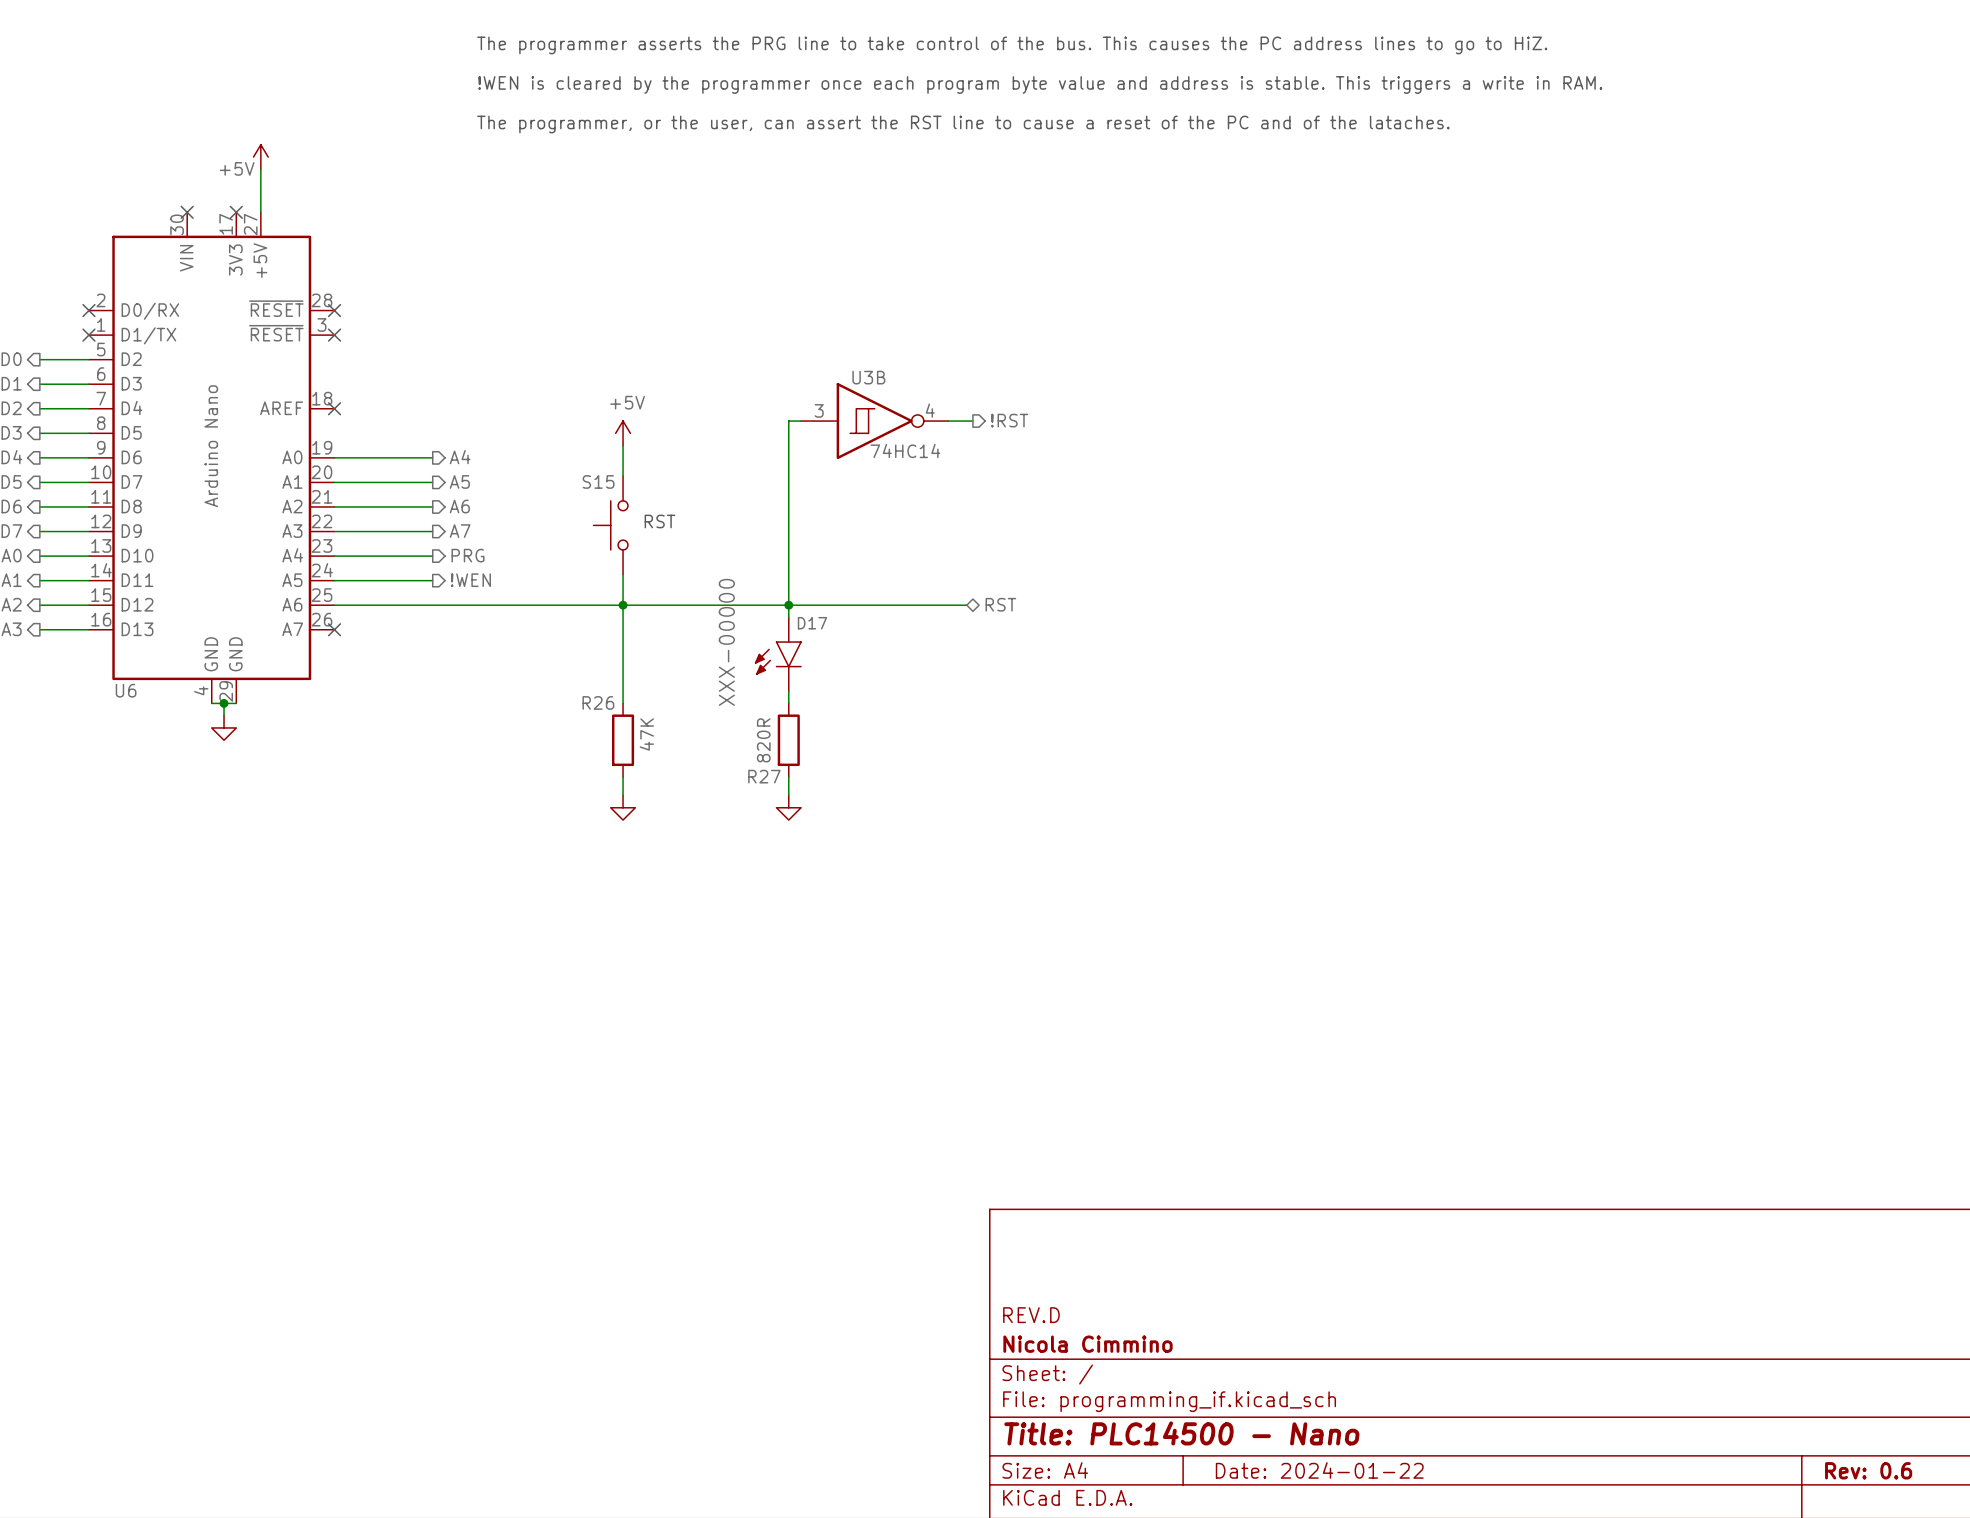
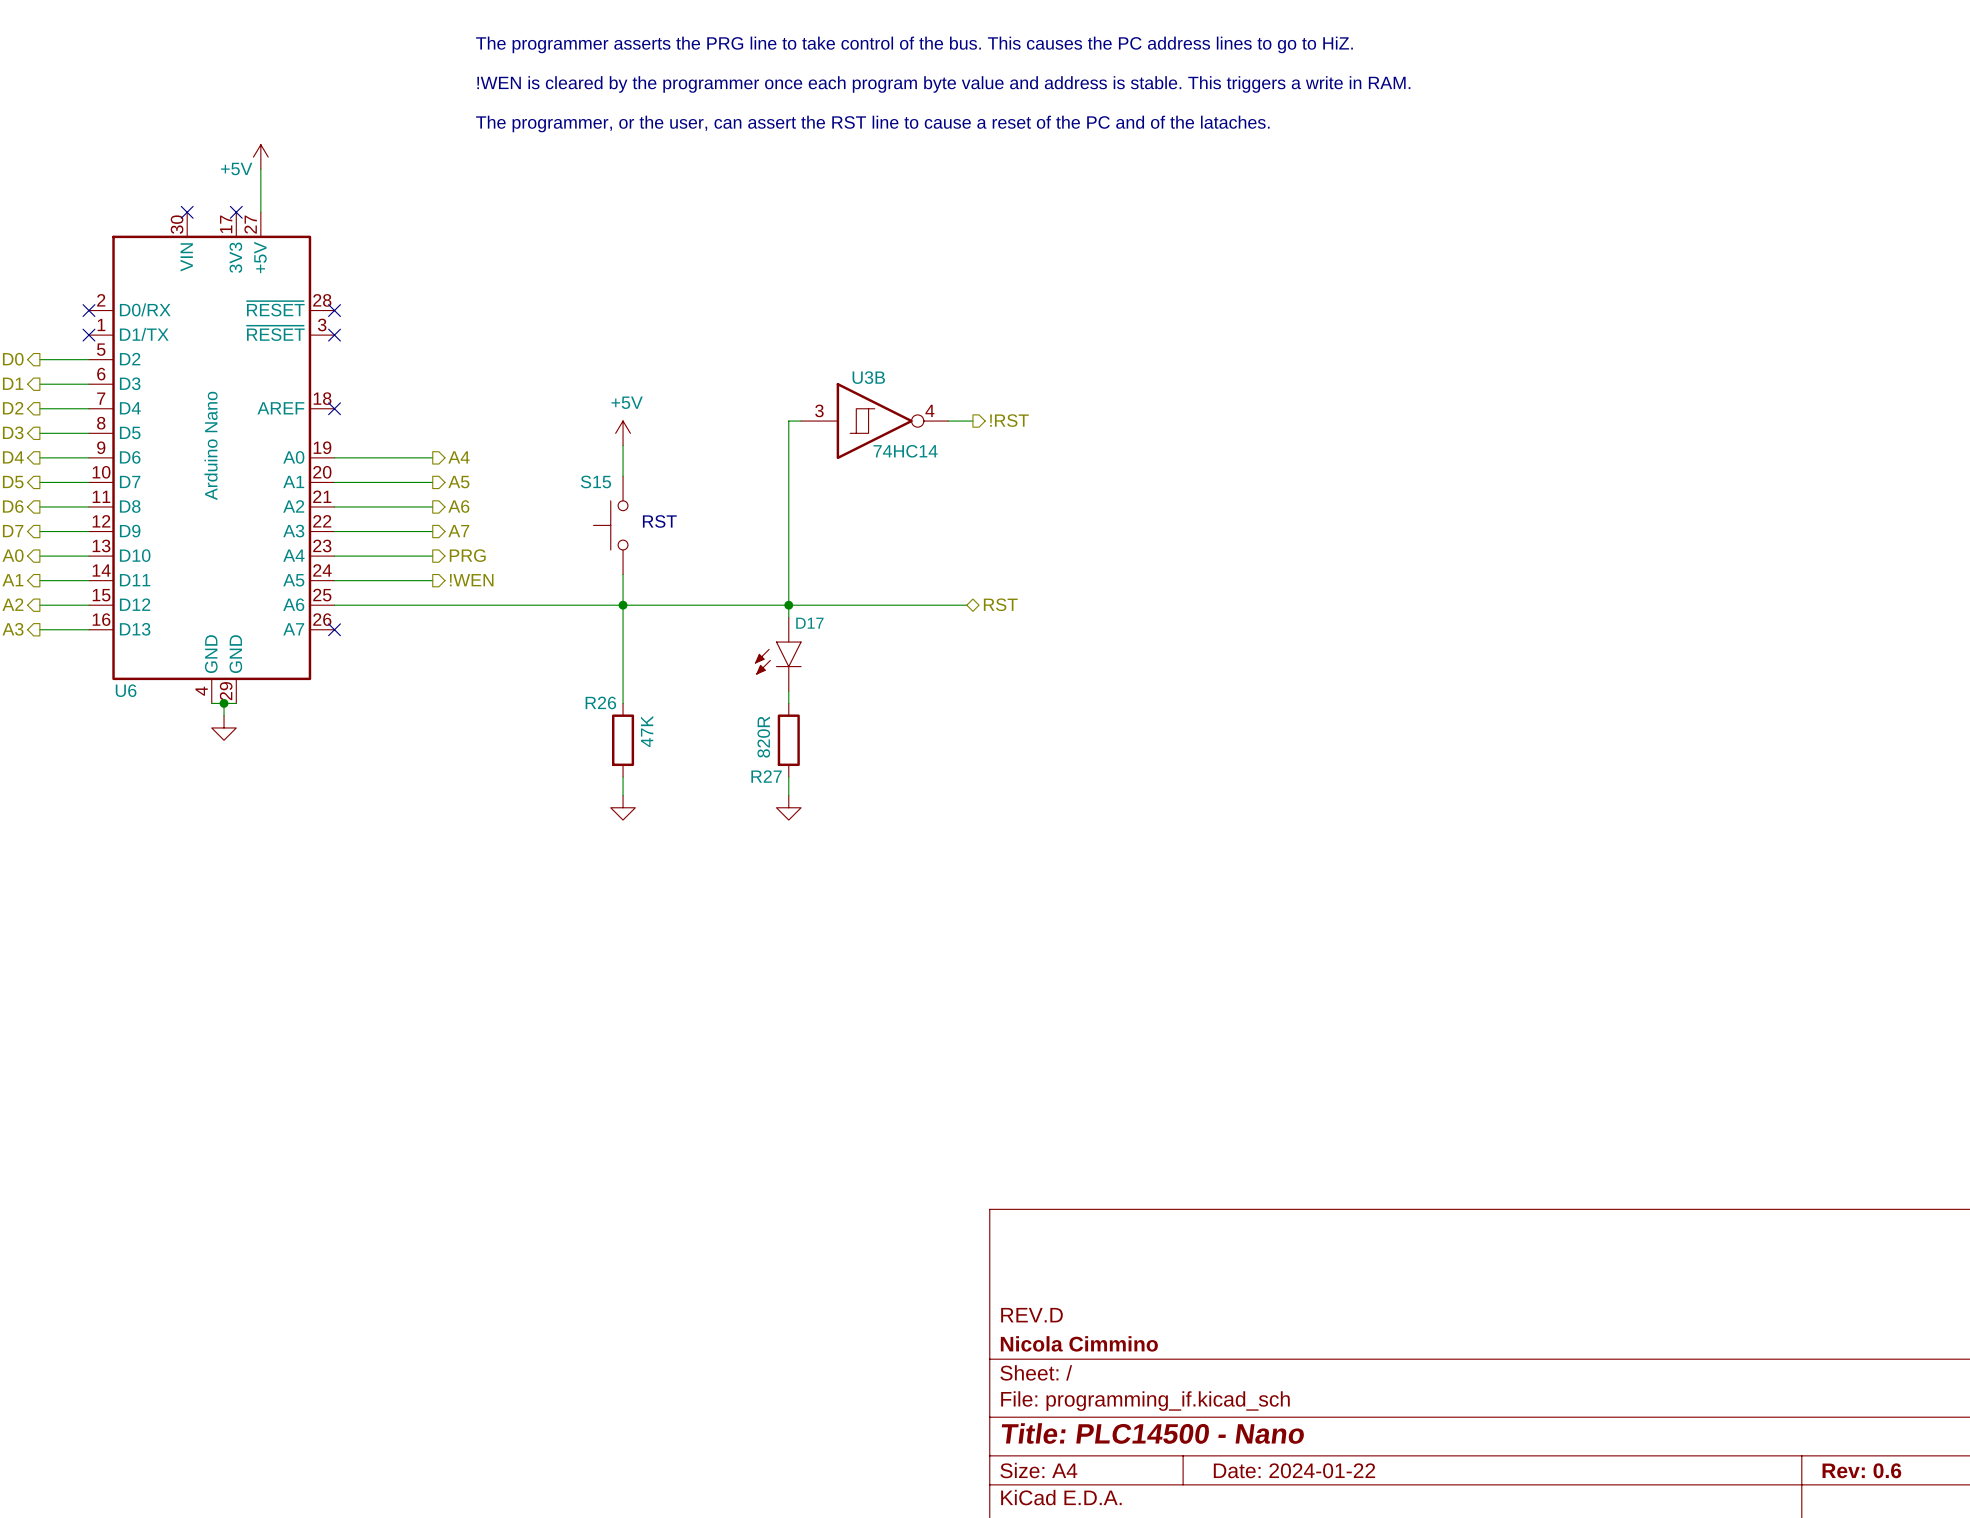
D17 text: XXX-00000 (726, 642) -> none

